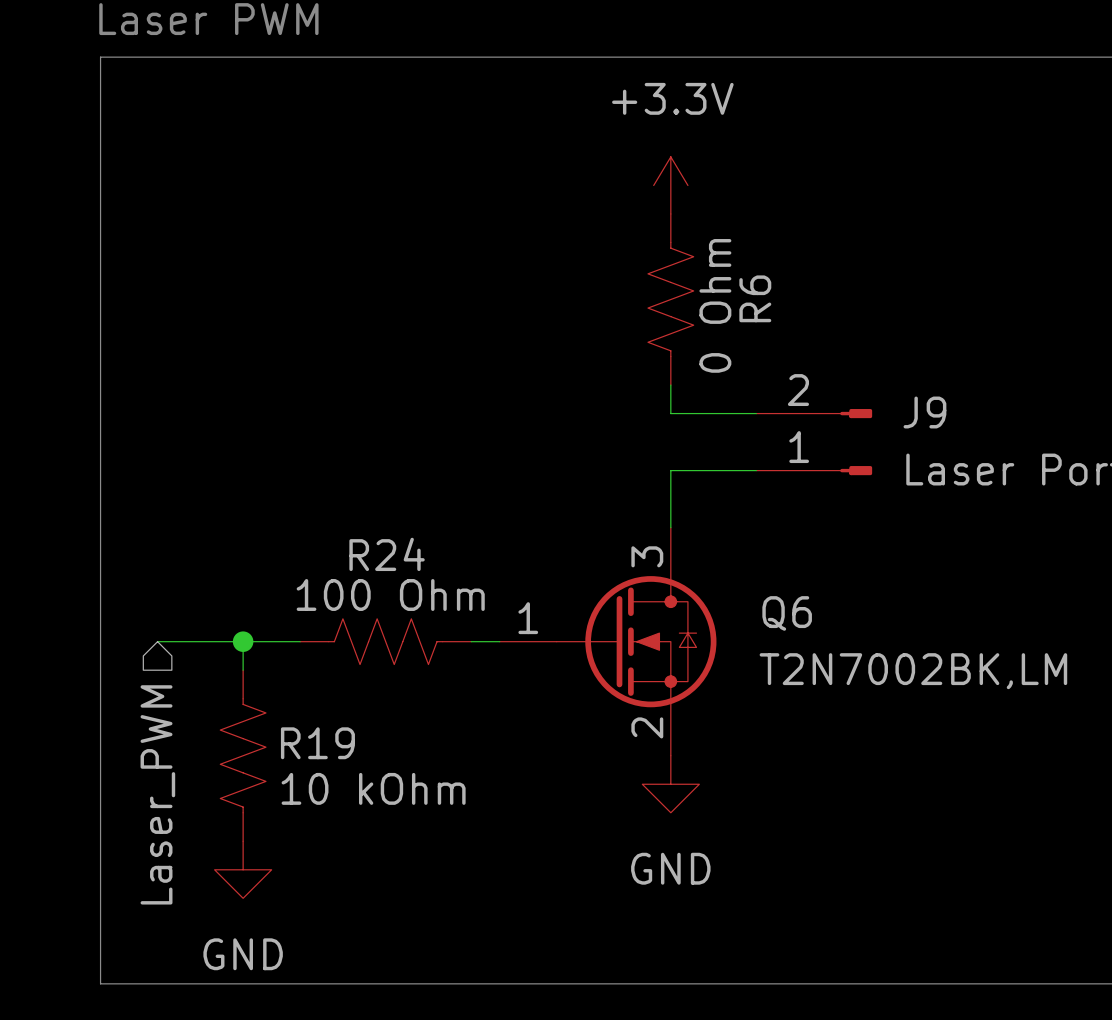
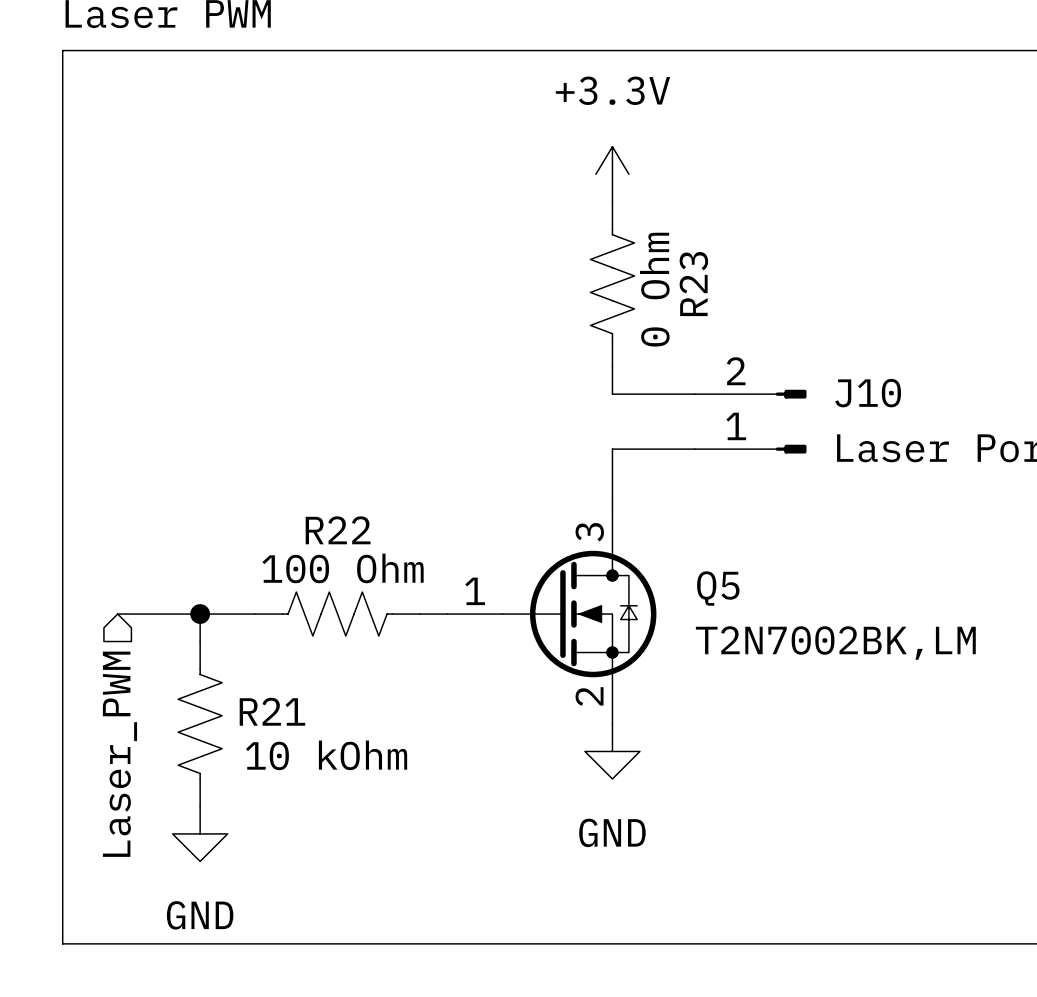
R6 name: R6 (755, 298) -> R23 (693, 284)
J9 name: J9 (924, 412) -> J10 (868, 393)
R24 name: R24 (387, 554) -> R22 (338, 530)
Q6 name: Q6 (787, 613) -> Q5 (718, 588)
R19 name: R19 (317, 743) -> R21 (272, 711)

